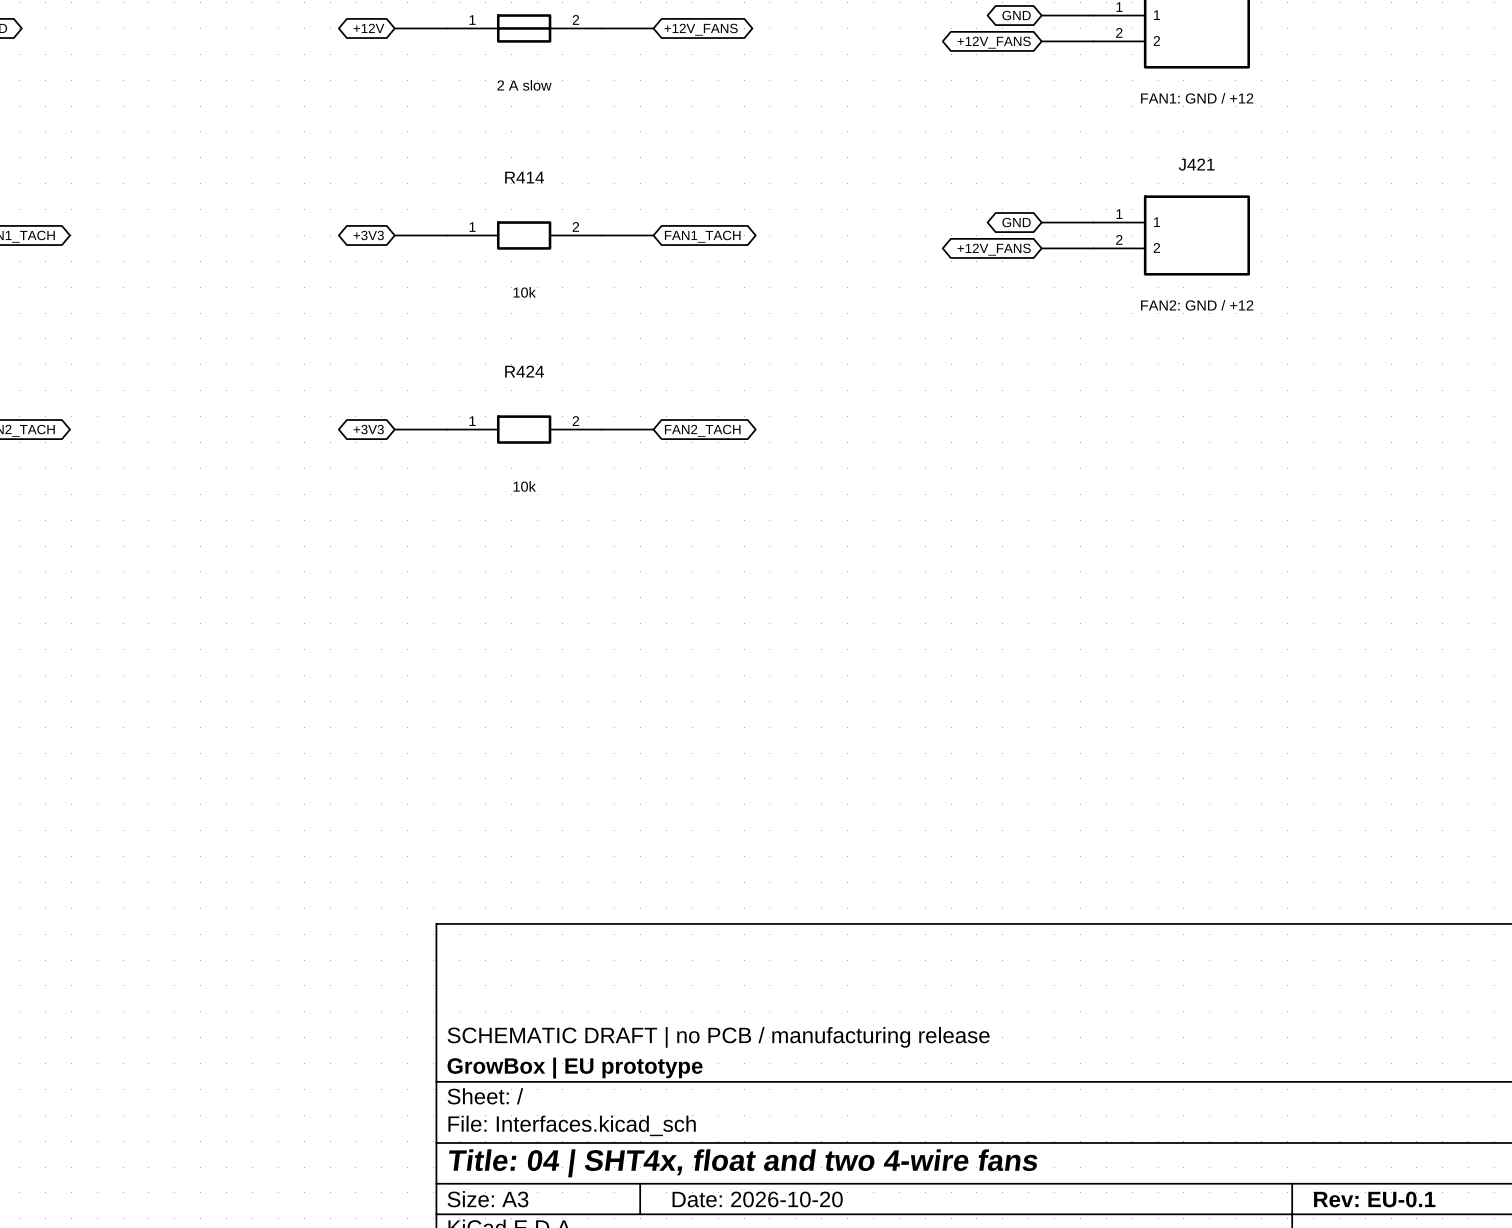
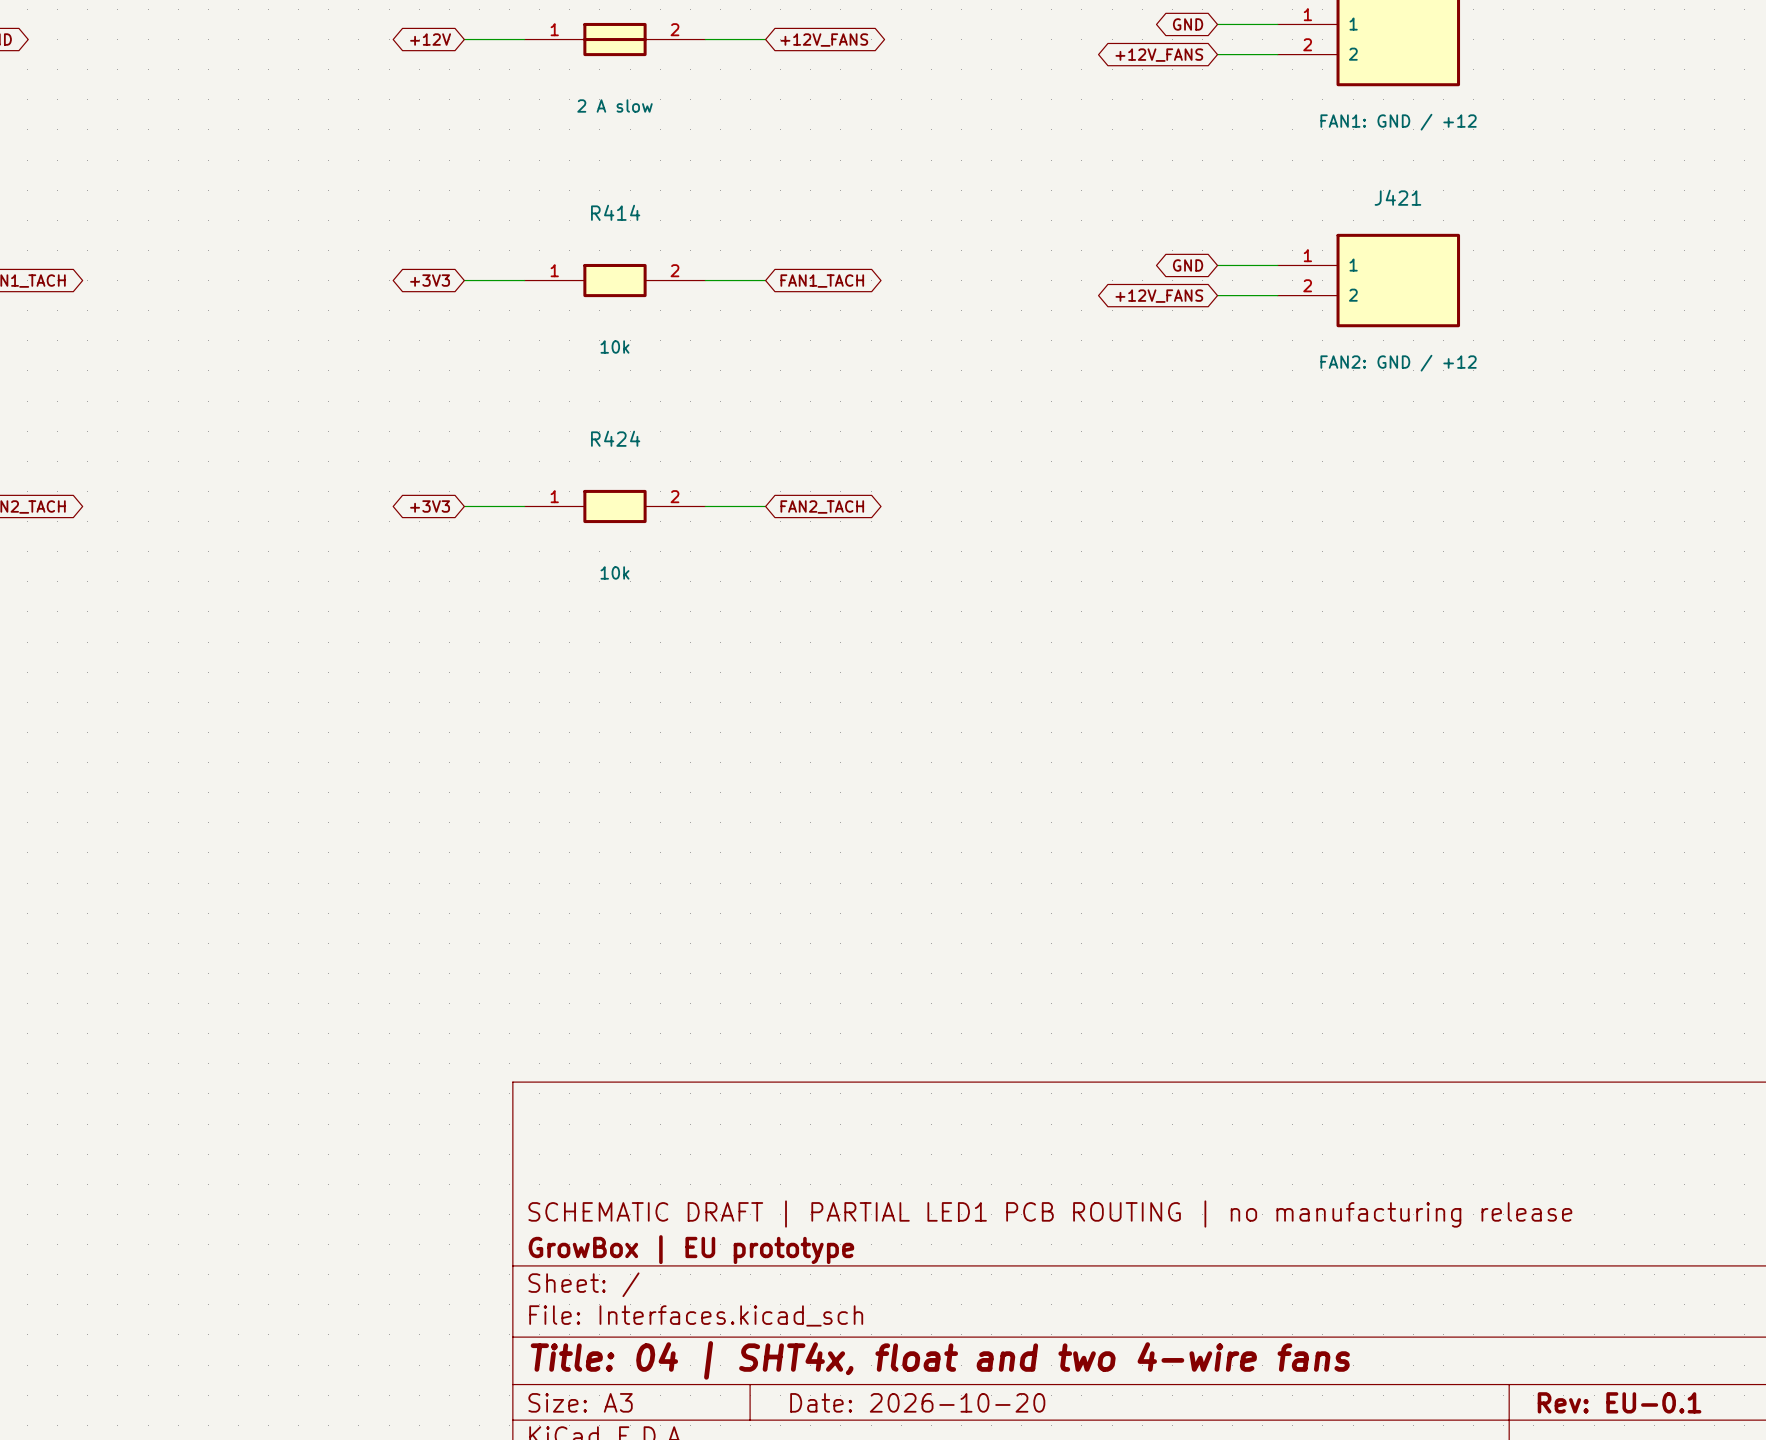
title block: SCHEMATIC DRAFT | no PCB / manufacturing release (718, 1037) -> SCHEMATIC DRAFT | PARTIAL LED1 PCB ROUTING | no manufacturing release (1050, 1214)

